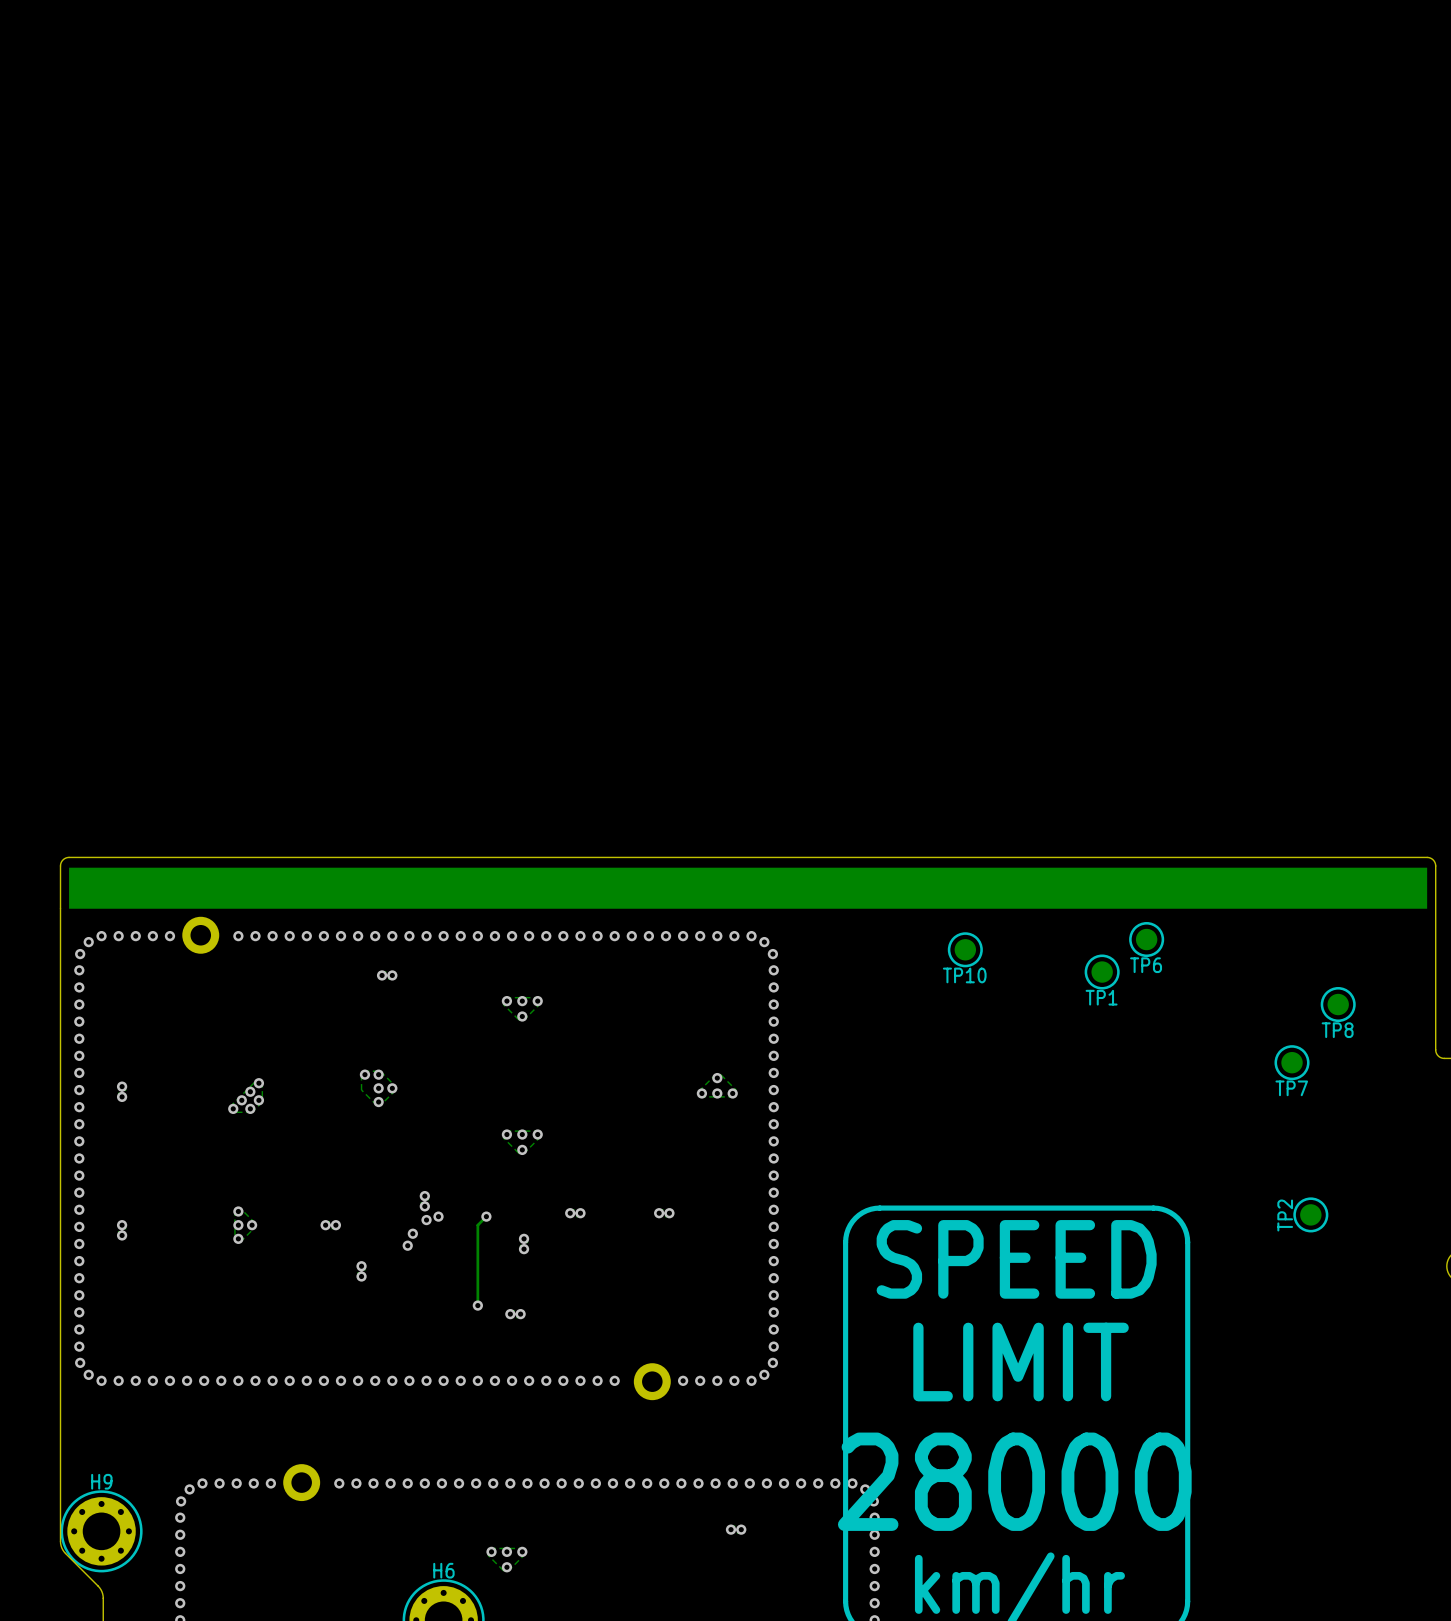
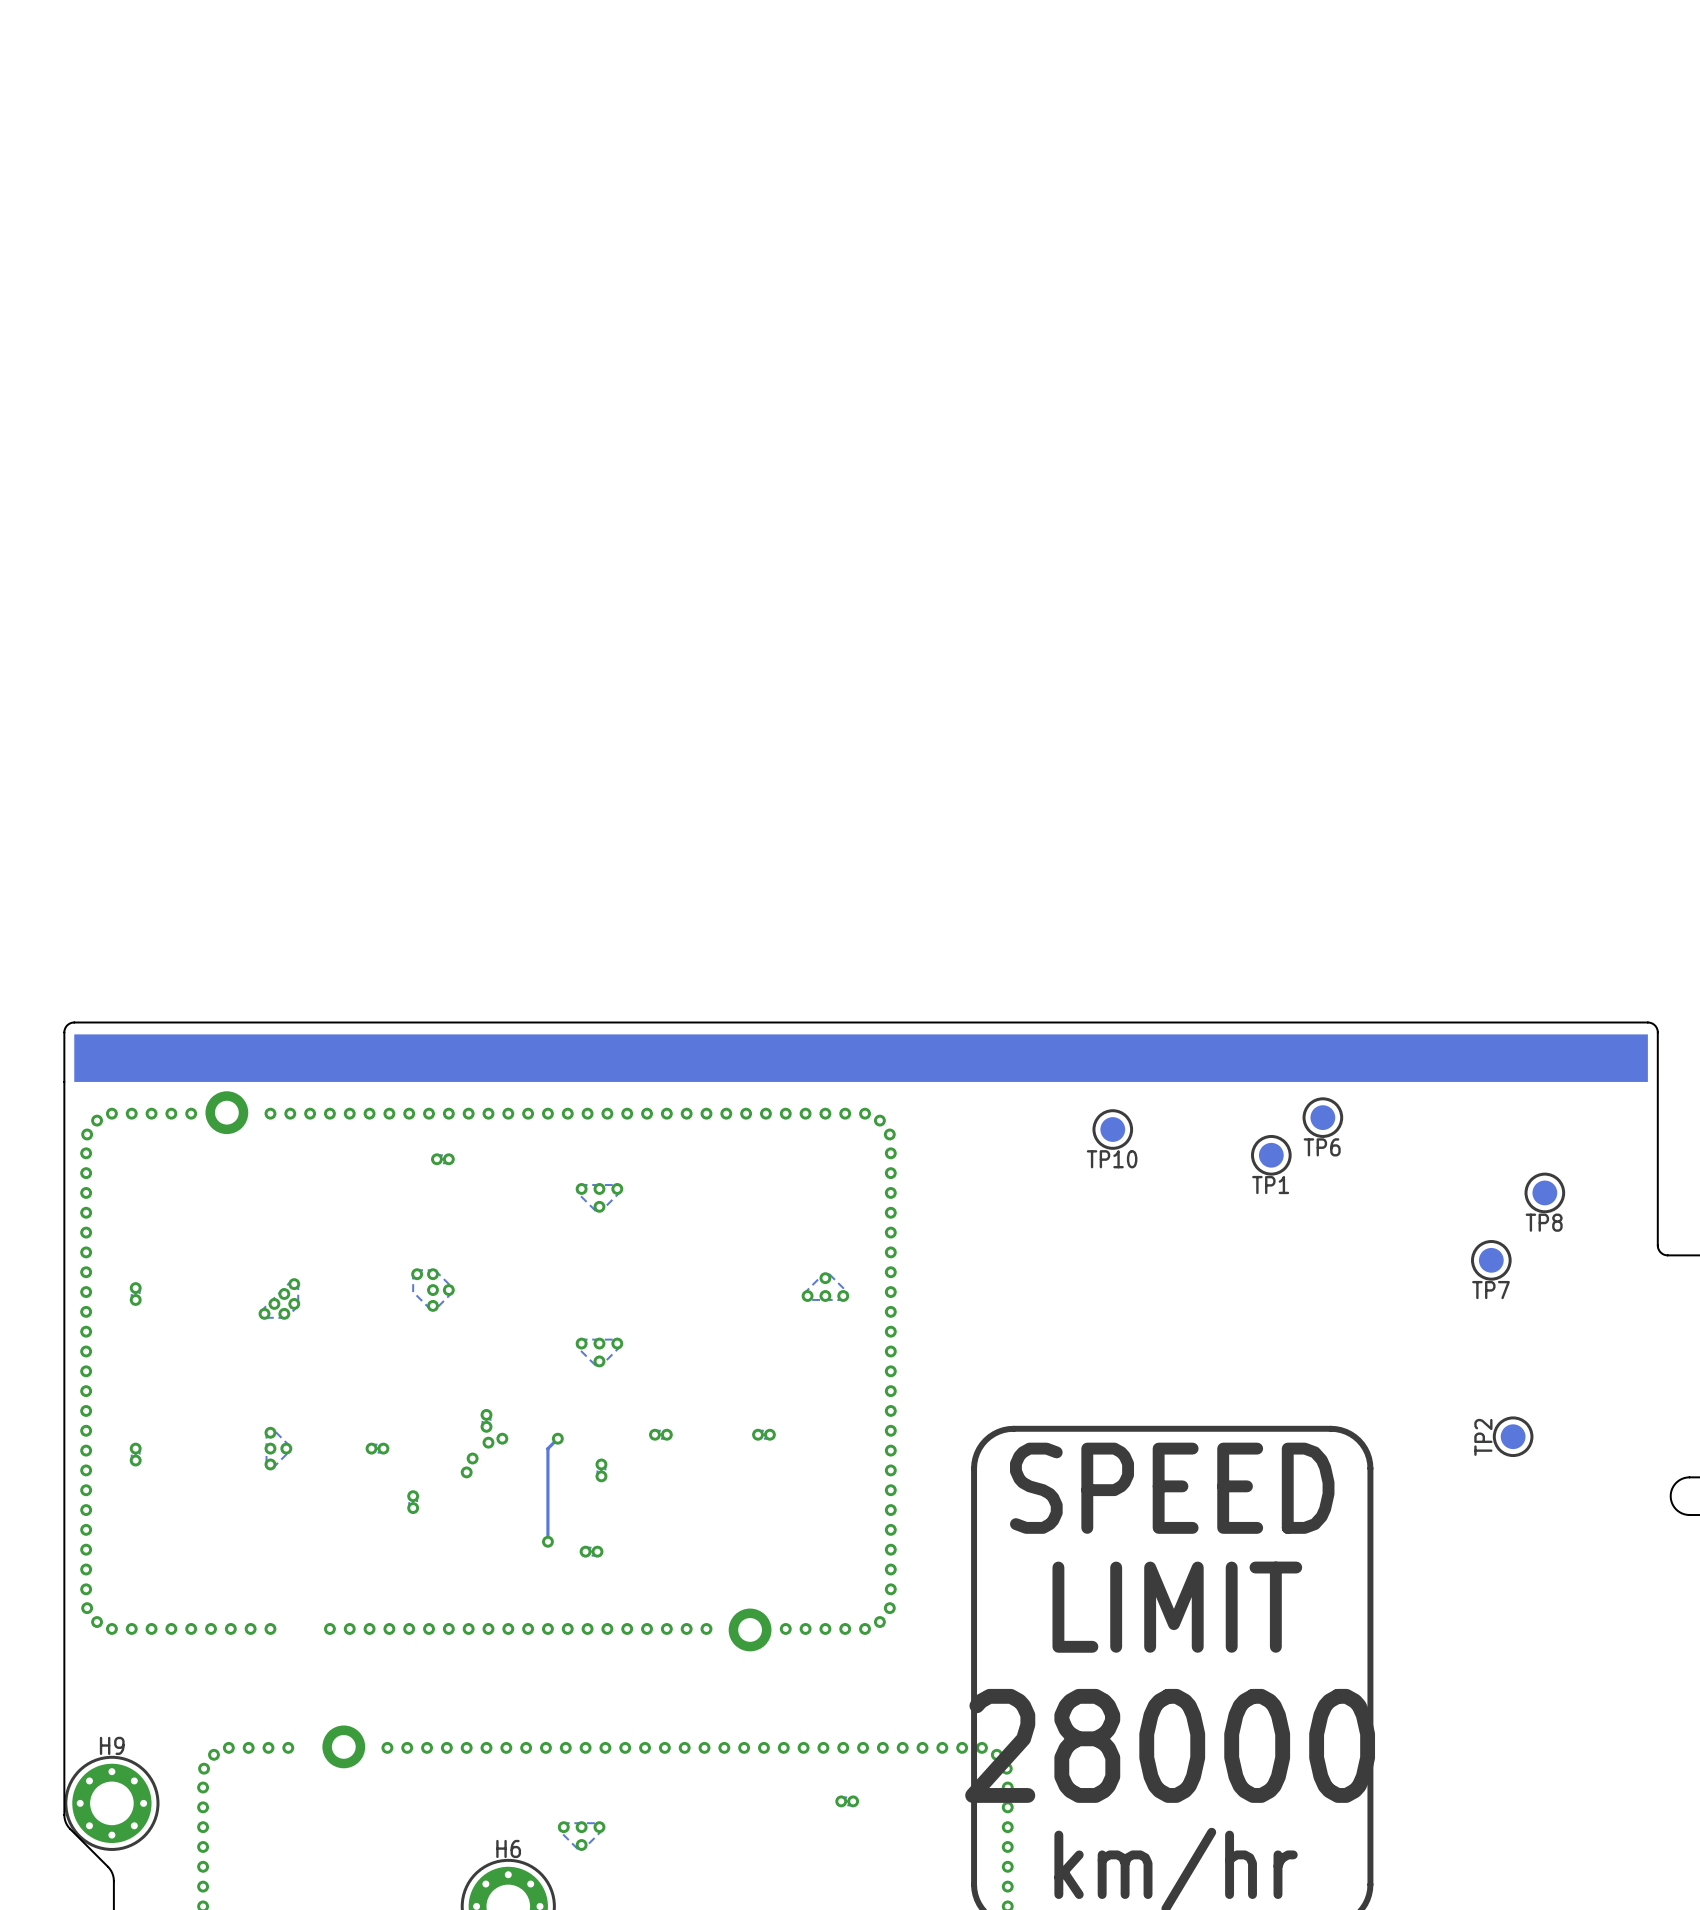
via: (255, 1380) -> none
via: (272, 1380) -> none
via: (270, 1483) -> none

